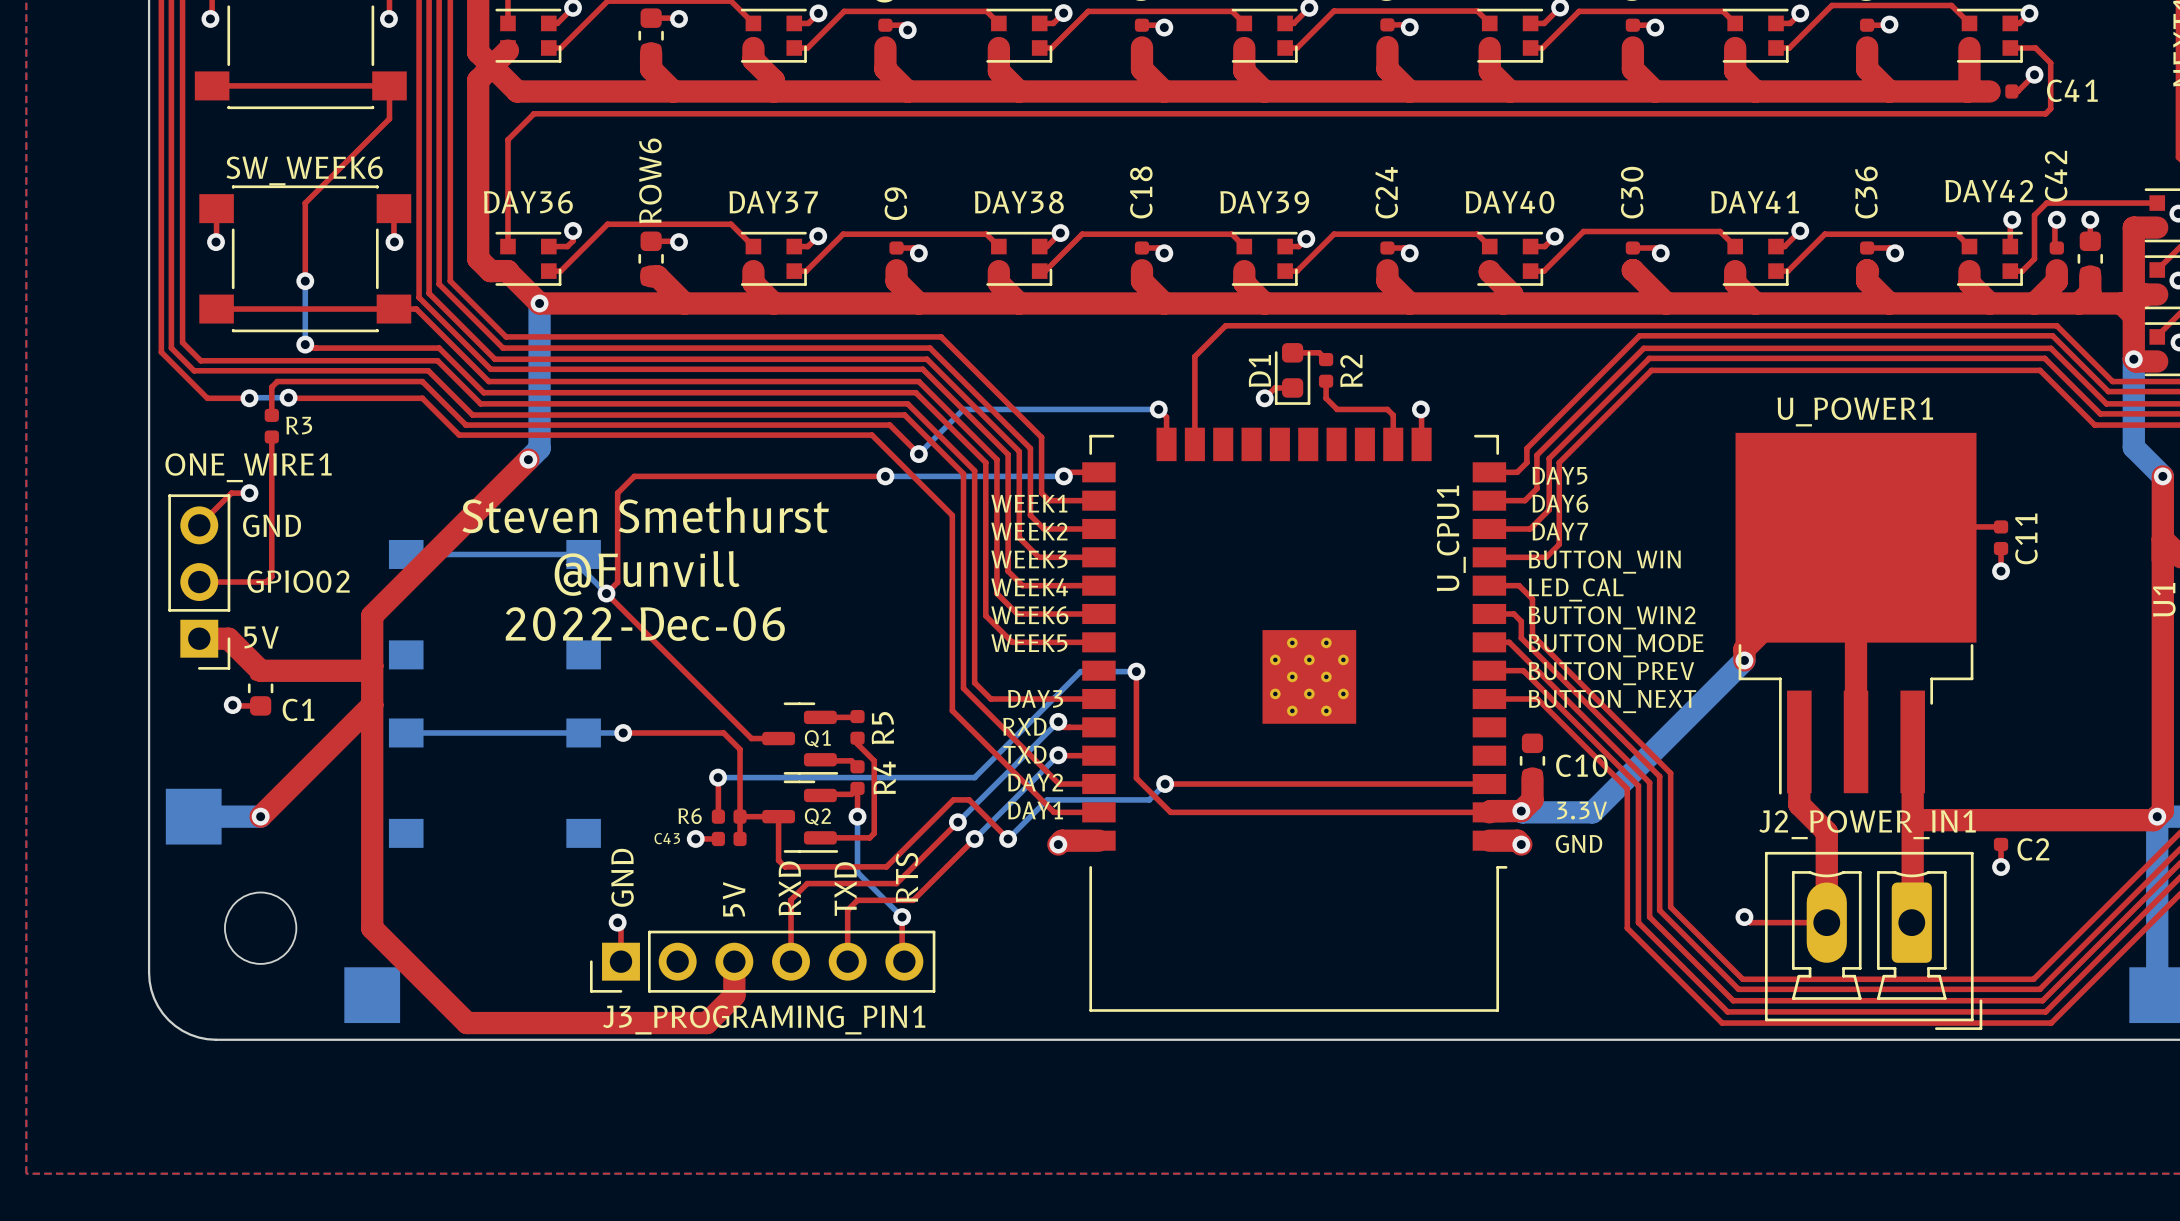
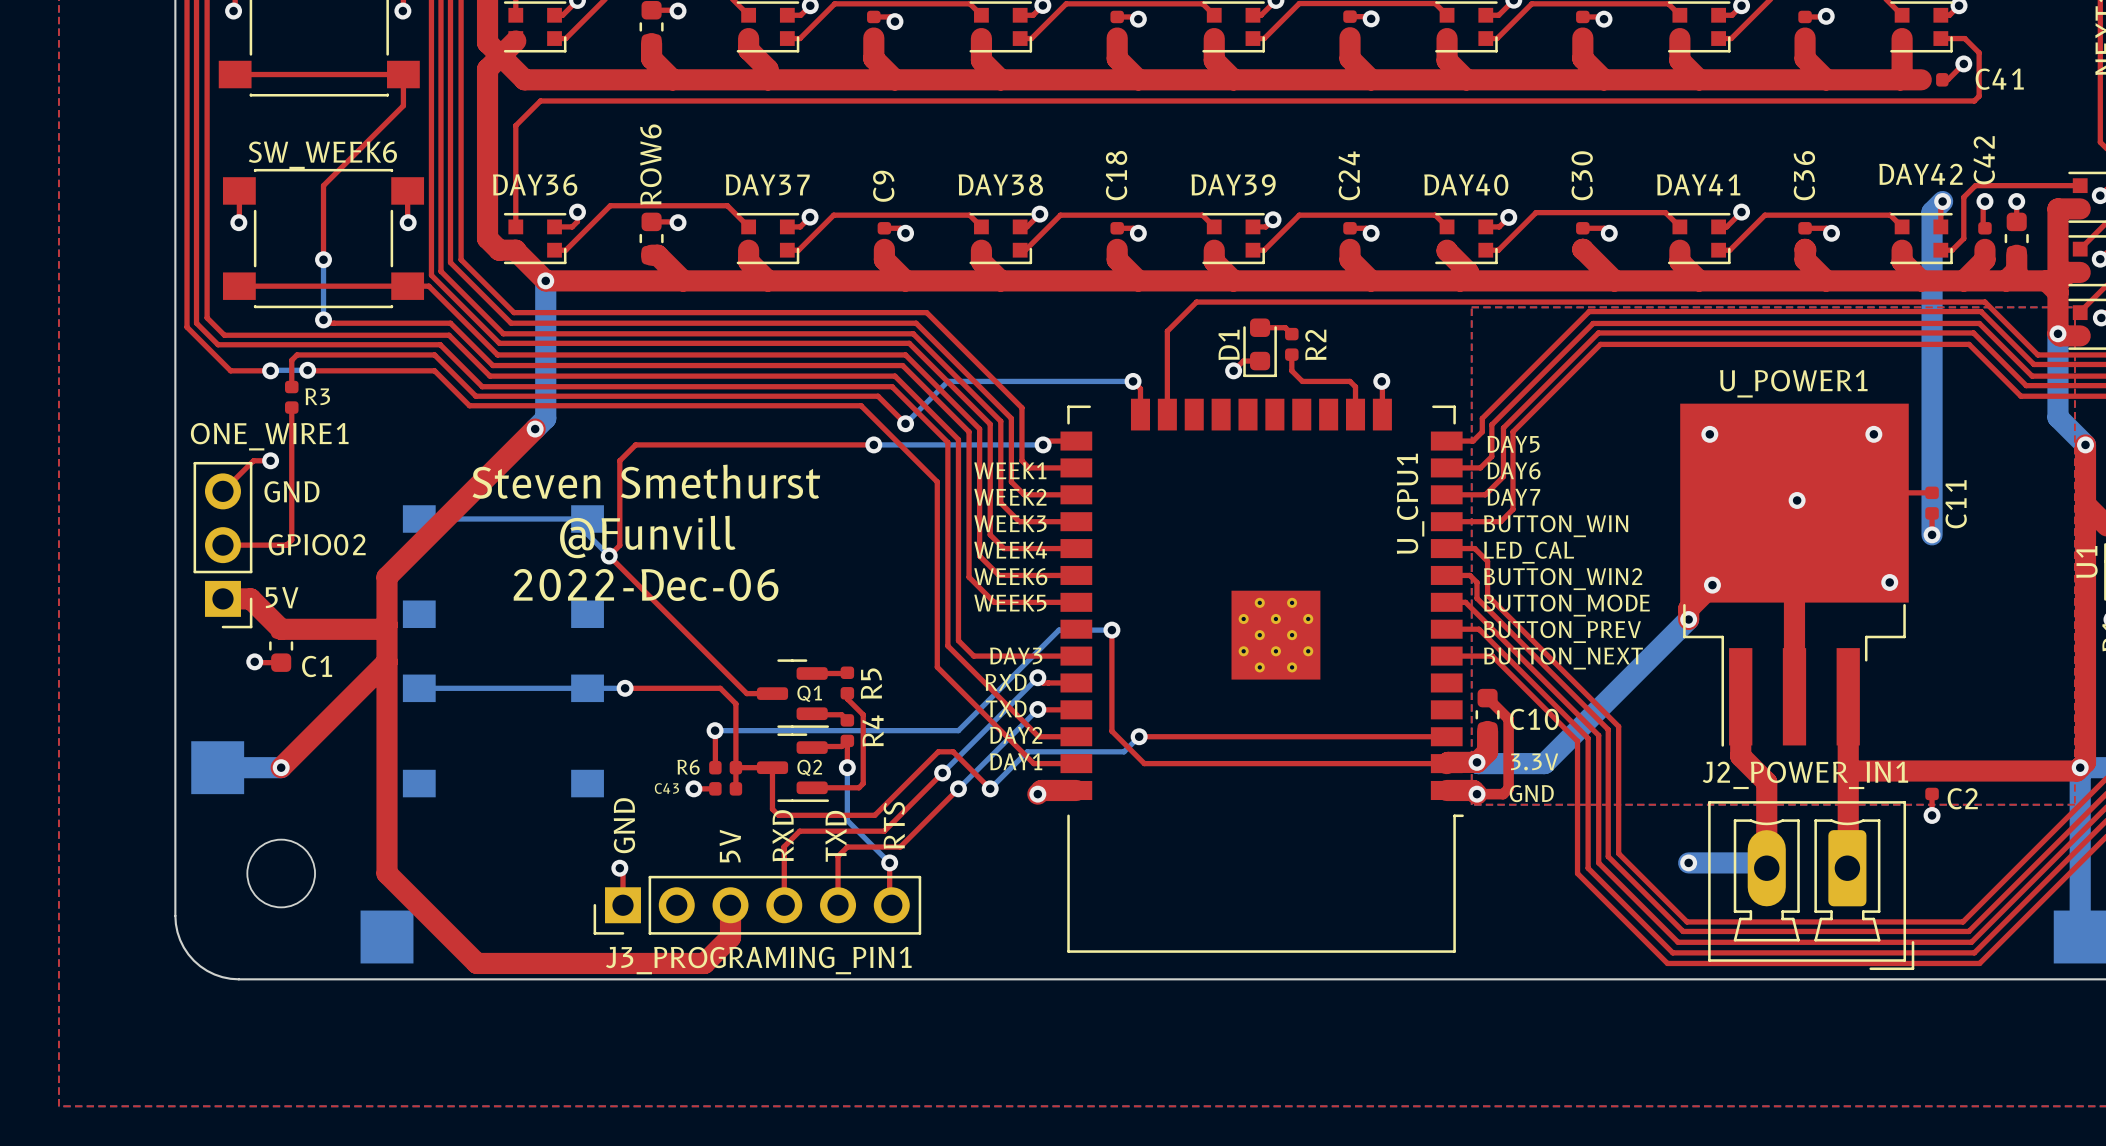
bottom track: none -> (1942, 201) (1932, 212) (1932, 534)
top zone outline: none -> (1471, 307) (1471, 804) (2074, 804) (2074, 307) (1471, 307)
via: none -> (1709, 434)
via: none -> (1873, 434)
via: none -> (1797, 500)
via: none -> (1889, 582)
via: none -> (1712, 585)
top track: none -> (1487, 698) (1508, 719) (1508, 788) (1503, 794) (1477, 794)
top track: (1744, 917) (1750, 922) (1826, 922) -> none
bottom track: none -> (1688, 862) (1761, 862)

